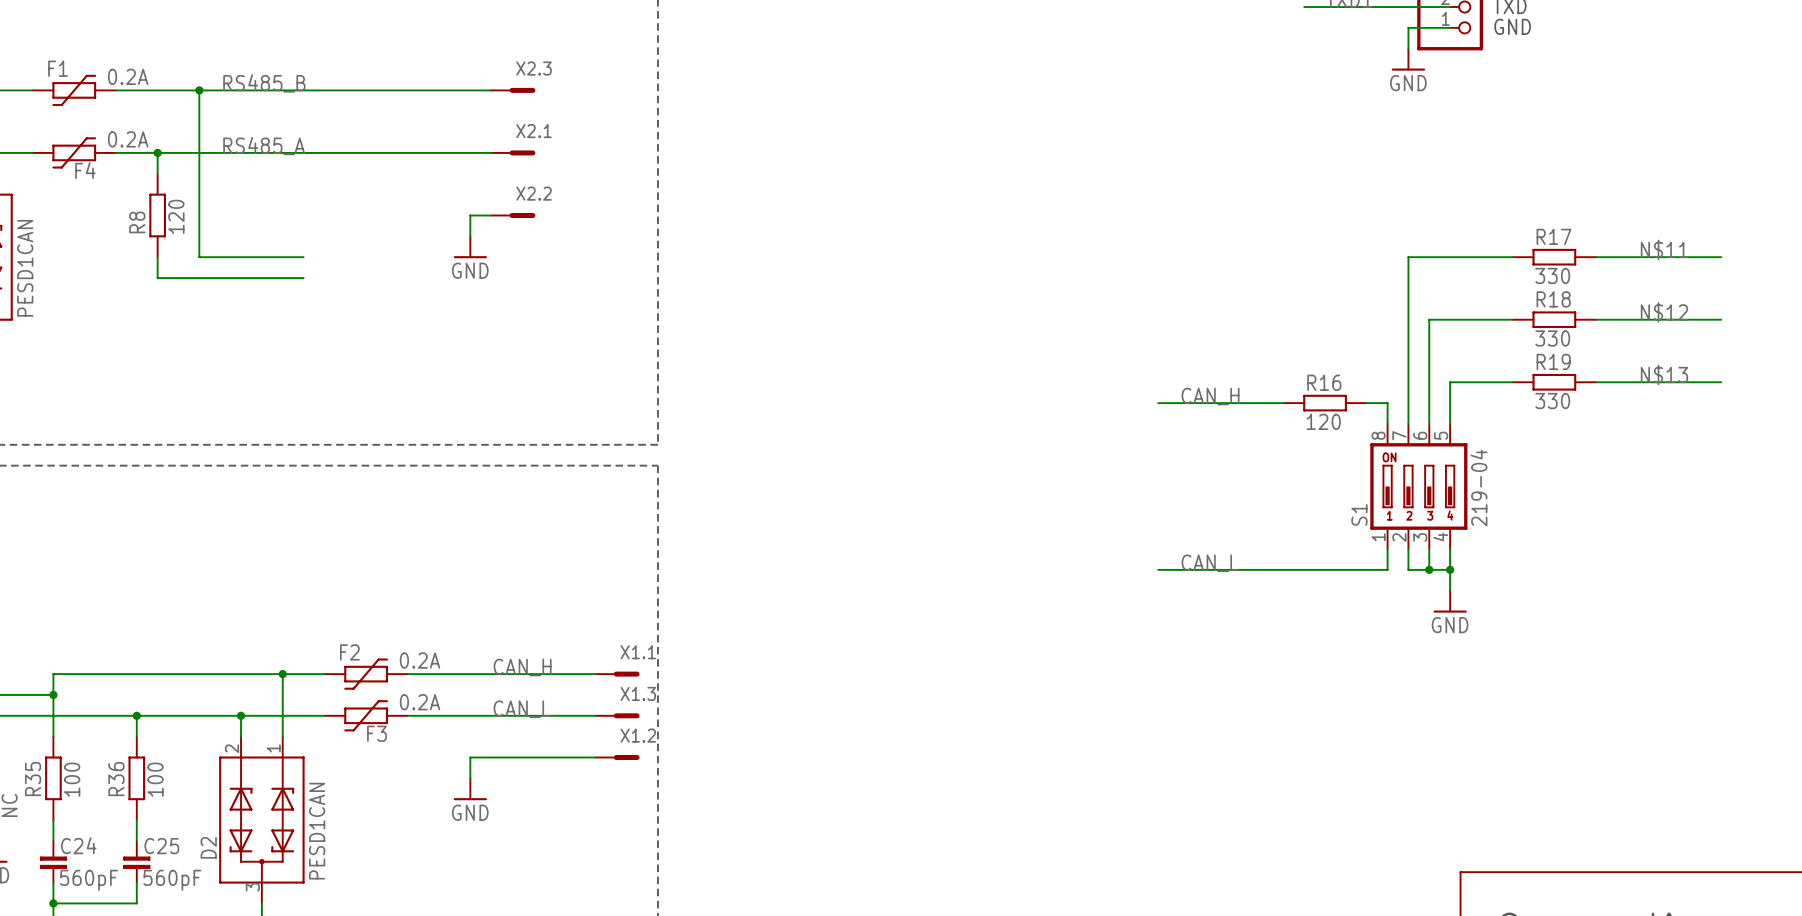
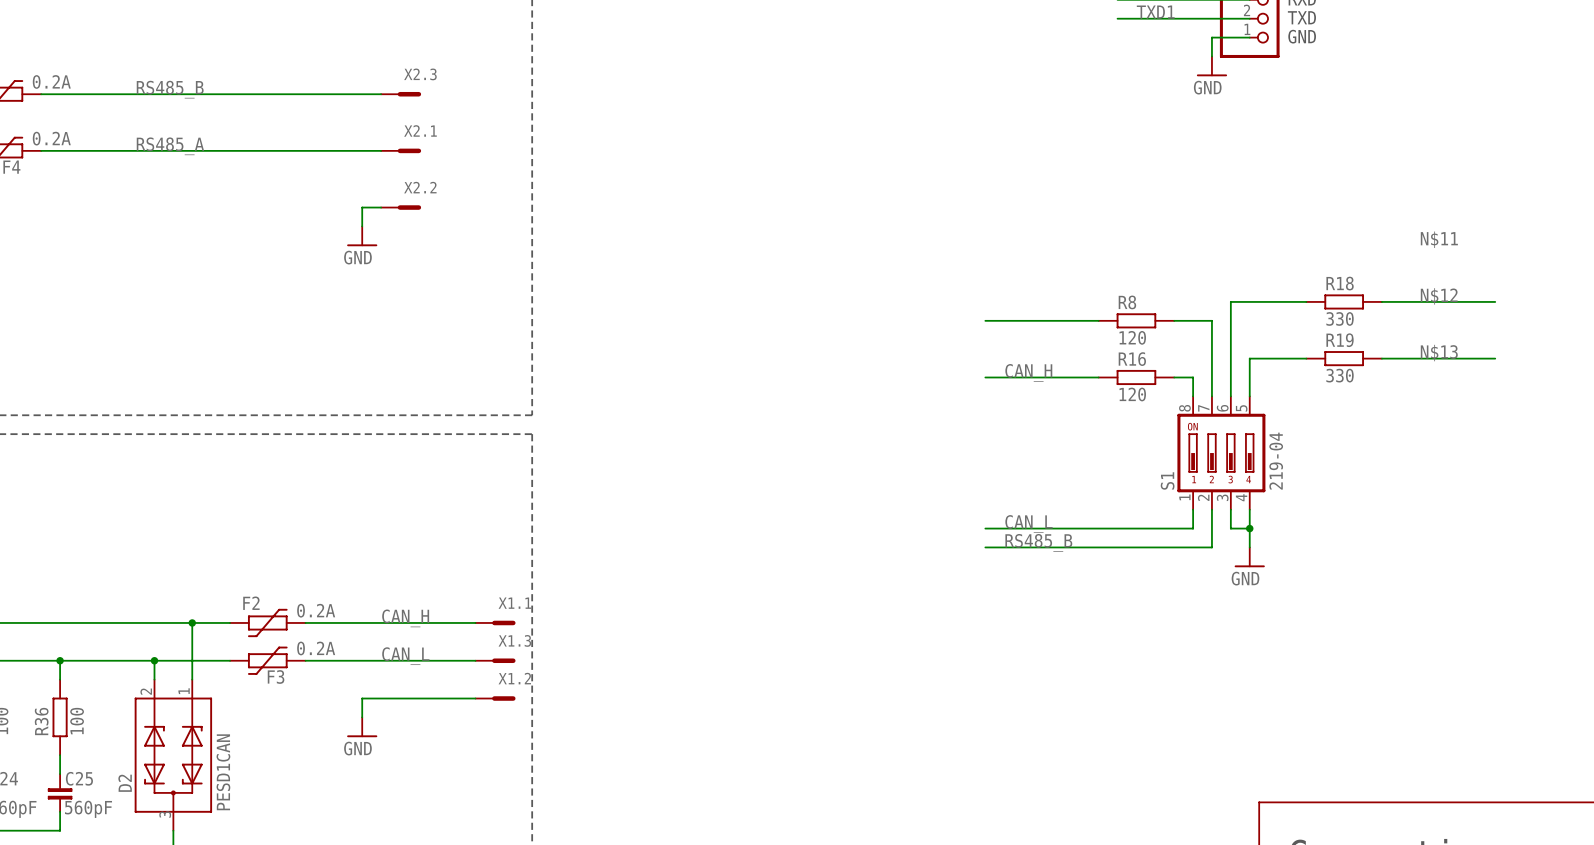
wire: (199, 90) (199, 257) (303, 257) -> none
junction: (199, 90) -> none
wire: (157, 152) (157, 173) -> none
junction: (157, 152) -> none
R8 rotation: 0° (157, 215) -> 90° clockwise (1136, 320)
R8 position: (157, 215) -> (1136, 320)
wire: (157, 257) (157, 278) (303, 278) -> none
wire: (1512, 257) (1408, 257) (1408, 340) -> (1174, 320) (1211, 320)
R17: 330 (1554, 257) -> none
wire: (1596, 257) (1721, 257) -> none
wire: none -> (985, 320) (1098, 320)
wire: (1408, 569) (1429, 569) -> (1211, 528) (1211, 547) (985, 547)
junction: (1429, 569) -> none
label: none -> RS485_B (1038, 542)

